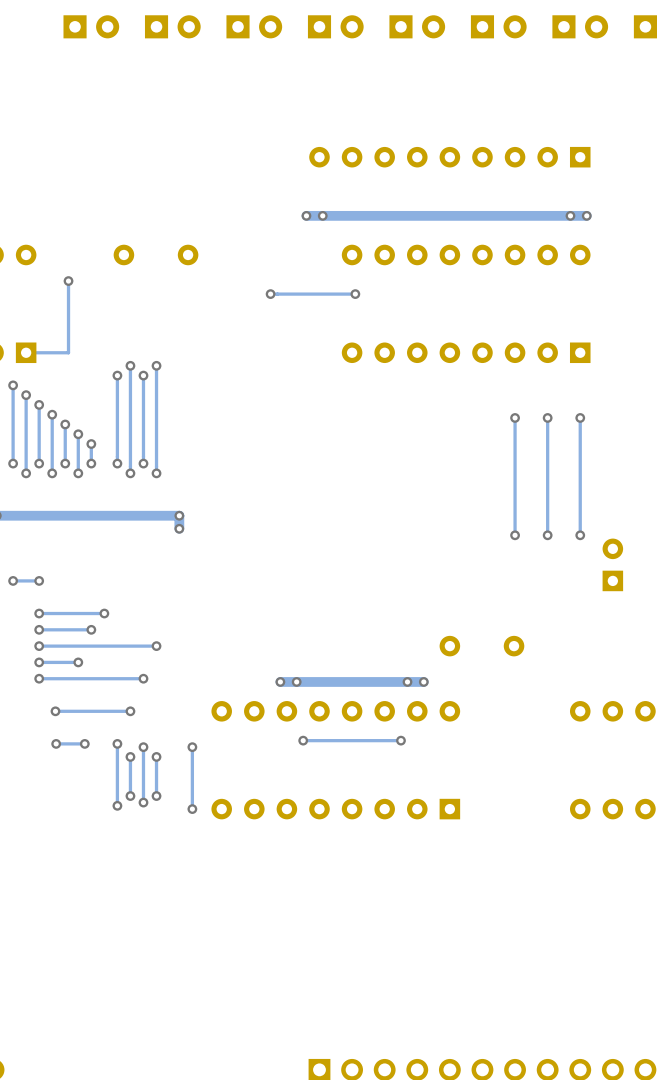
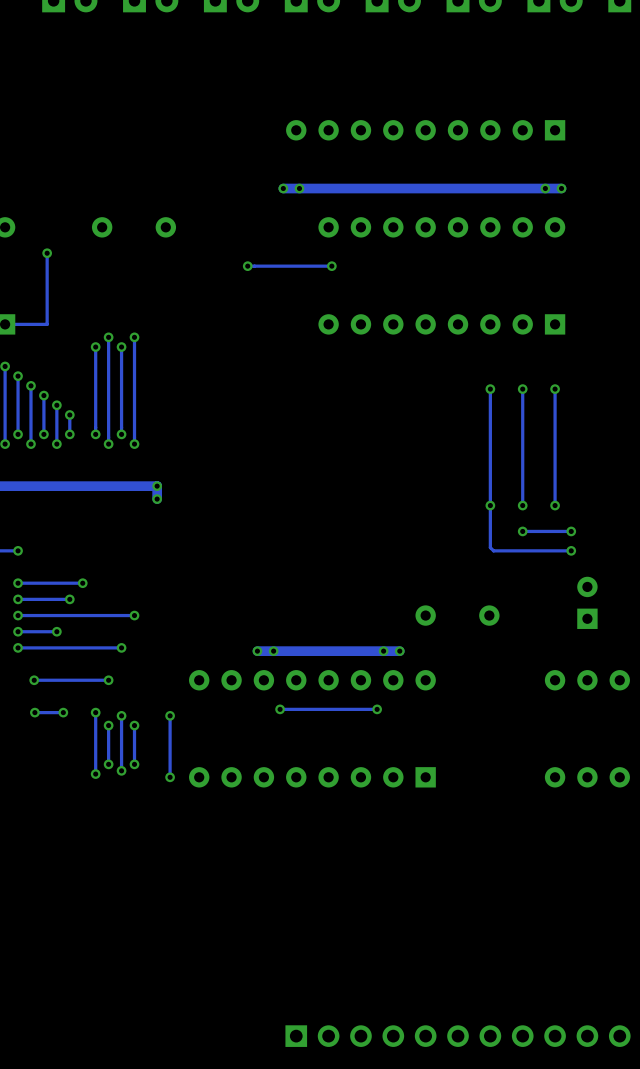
track: none -> (490, 505) (490, 547) (493, 550) (571, 550)
via: none -> (522, 531)
track: none -> (571, 531) (522, 531)
via: none -> (571, 531)
part position: (612, 564) -> (587, 602)
via: none -> (571, 550)

